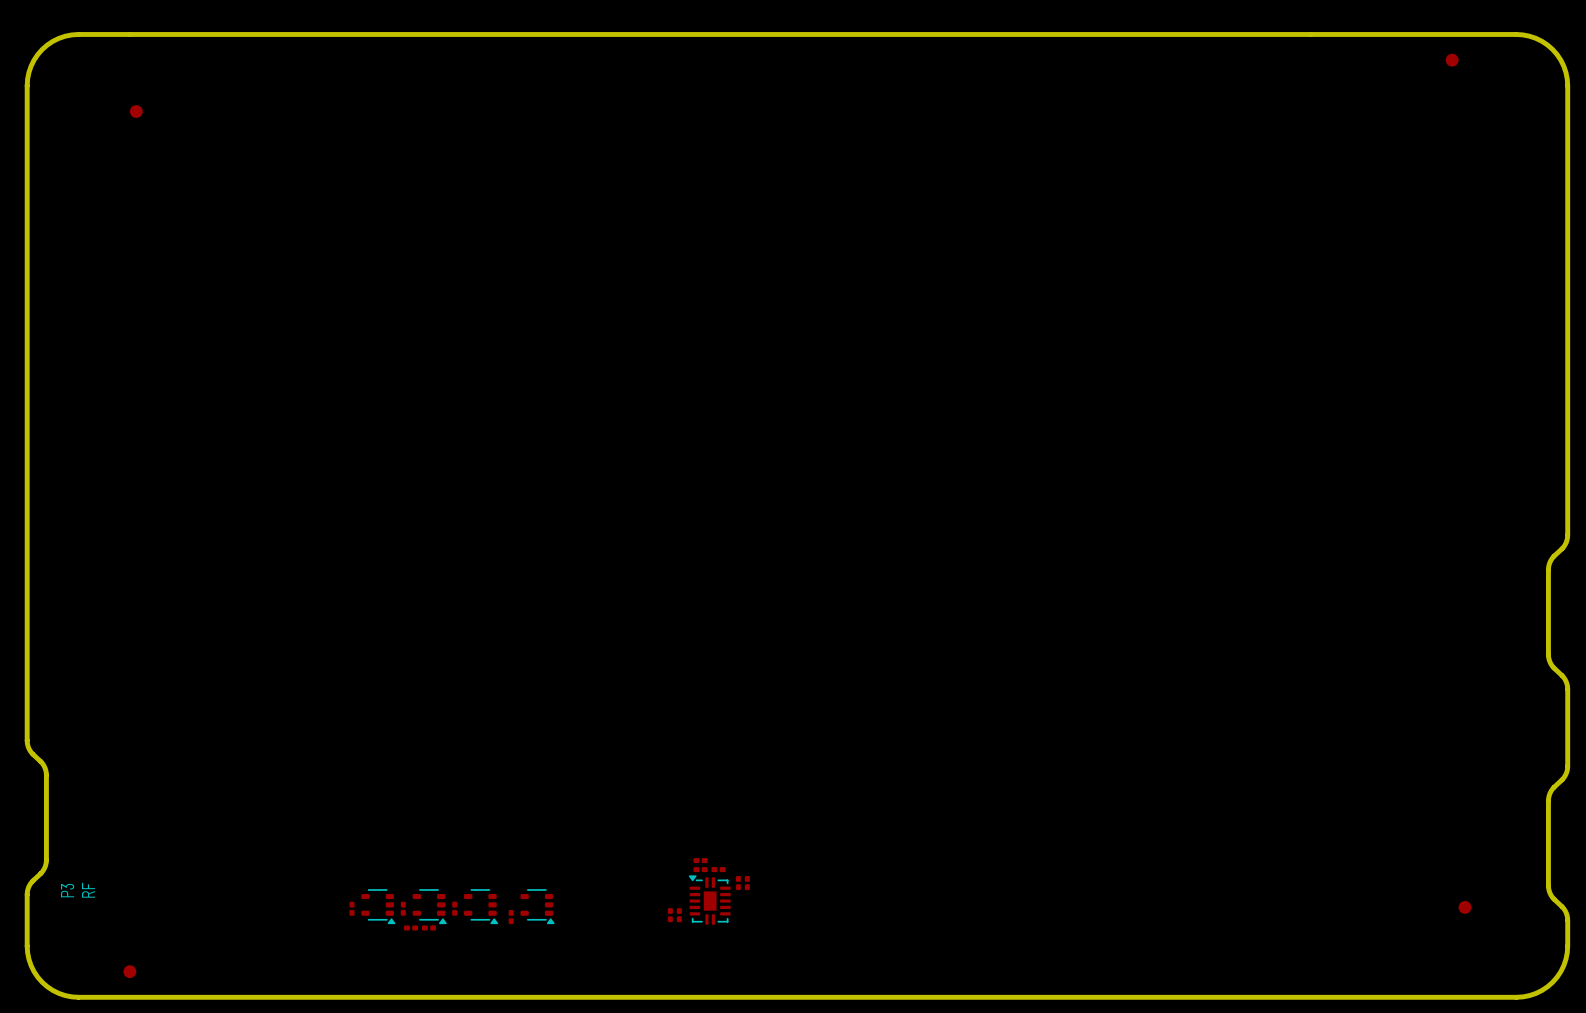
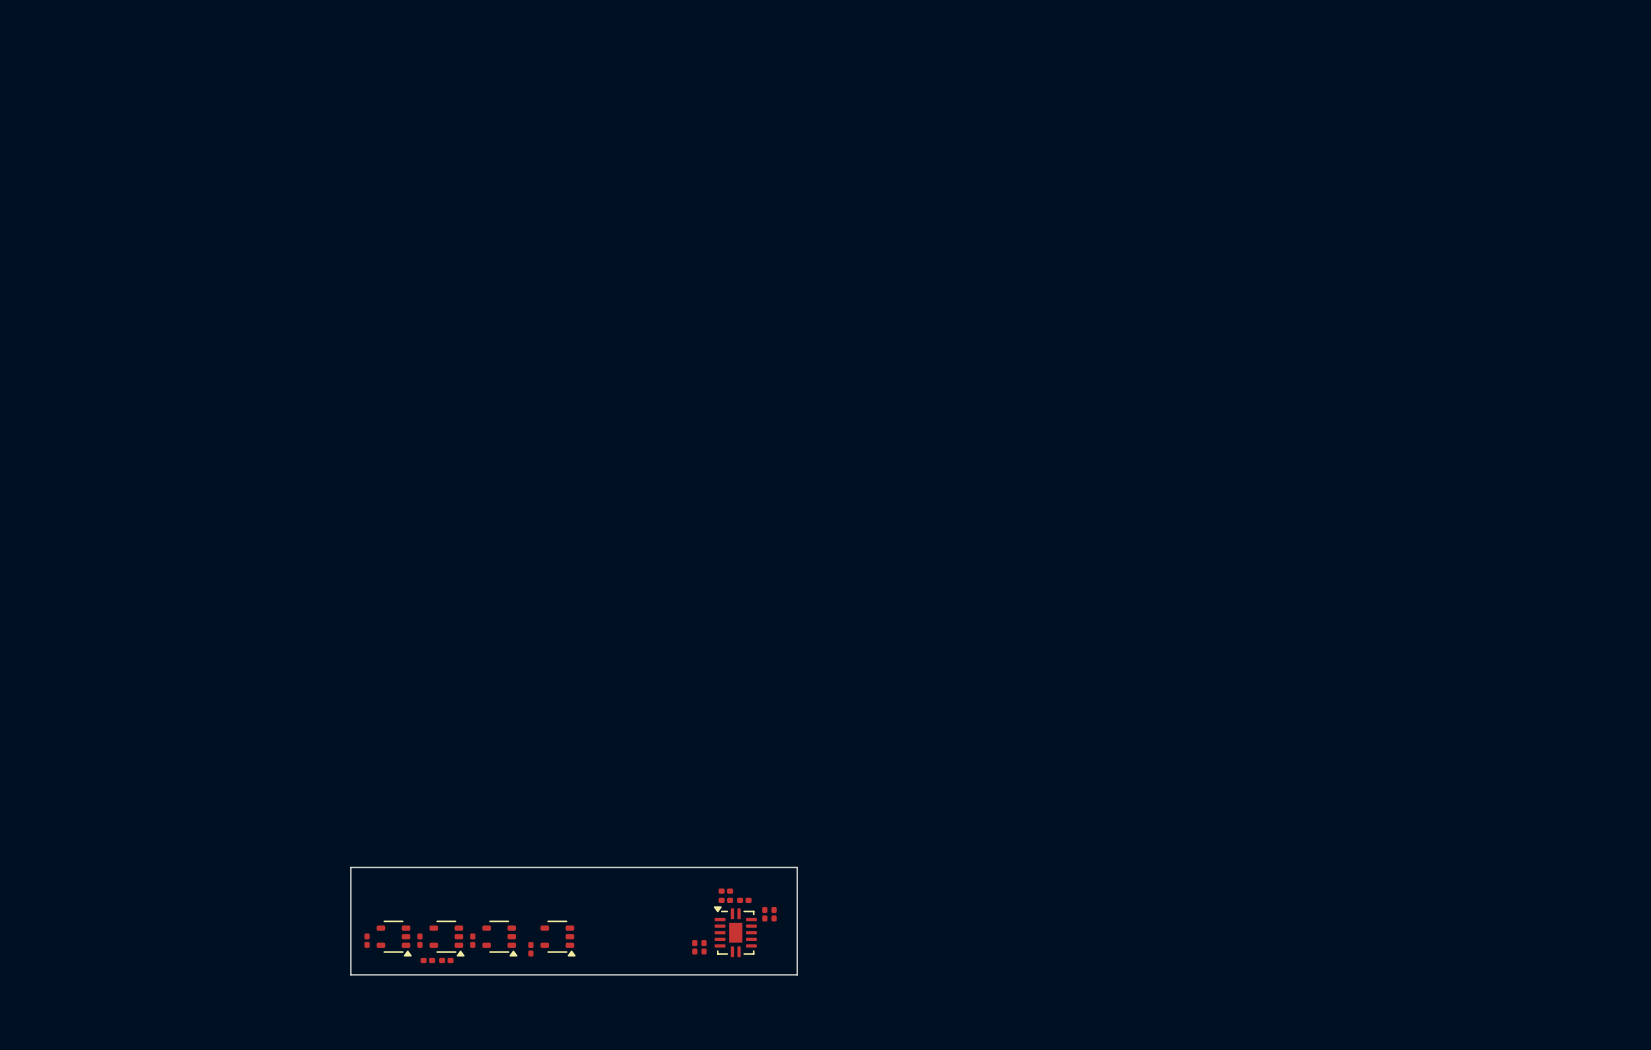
board edge: (78, 34) (1516, 34) (1529, 36) (1542, 41) (1552, 49) (1560, 60) (1565, 72) (1567, 85) (1567, 535) (1565, 544) (1551, 560) (1548, 569) (1548, 657) (1552, 666) (1565, 679) (1567, 689) (1567, 768) (1563, 777) (1551, 791) (1548, 800) (1548, 888) (1552, 897) (1565, 910) (1567, 917) (1567, 952) (1560, 971) (1552, 982) (1542, 990) (1529, 995) (1516, 997) (78, 997) (65, 995) (52, 990) (42, 982) (34, 971) (28, 959) (27, 945) (27, 889) (31, 882) (43, 869) (46, 859) (46, 772) (42, 763) (29, 750) (27, 740) (27, 85) (31, 66) (42, 49) (58, 38) (78, 34) -> none
part: (1452, 60) -> none
part: (136, 111) -> none
board edge: none -> (350, 867) (350, 974) (797, 974) (797, 867) (350, 867)
text: P3 (67, 890) -> none
text: RF (88, 890) -> none
part: (1465, 907) -> none
part: (129, 971) -> none

